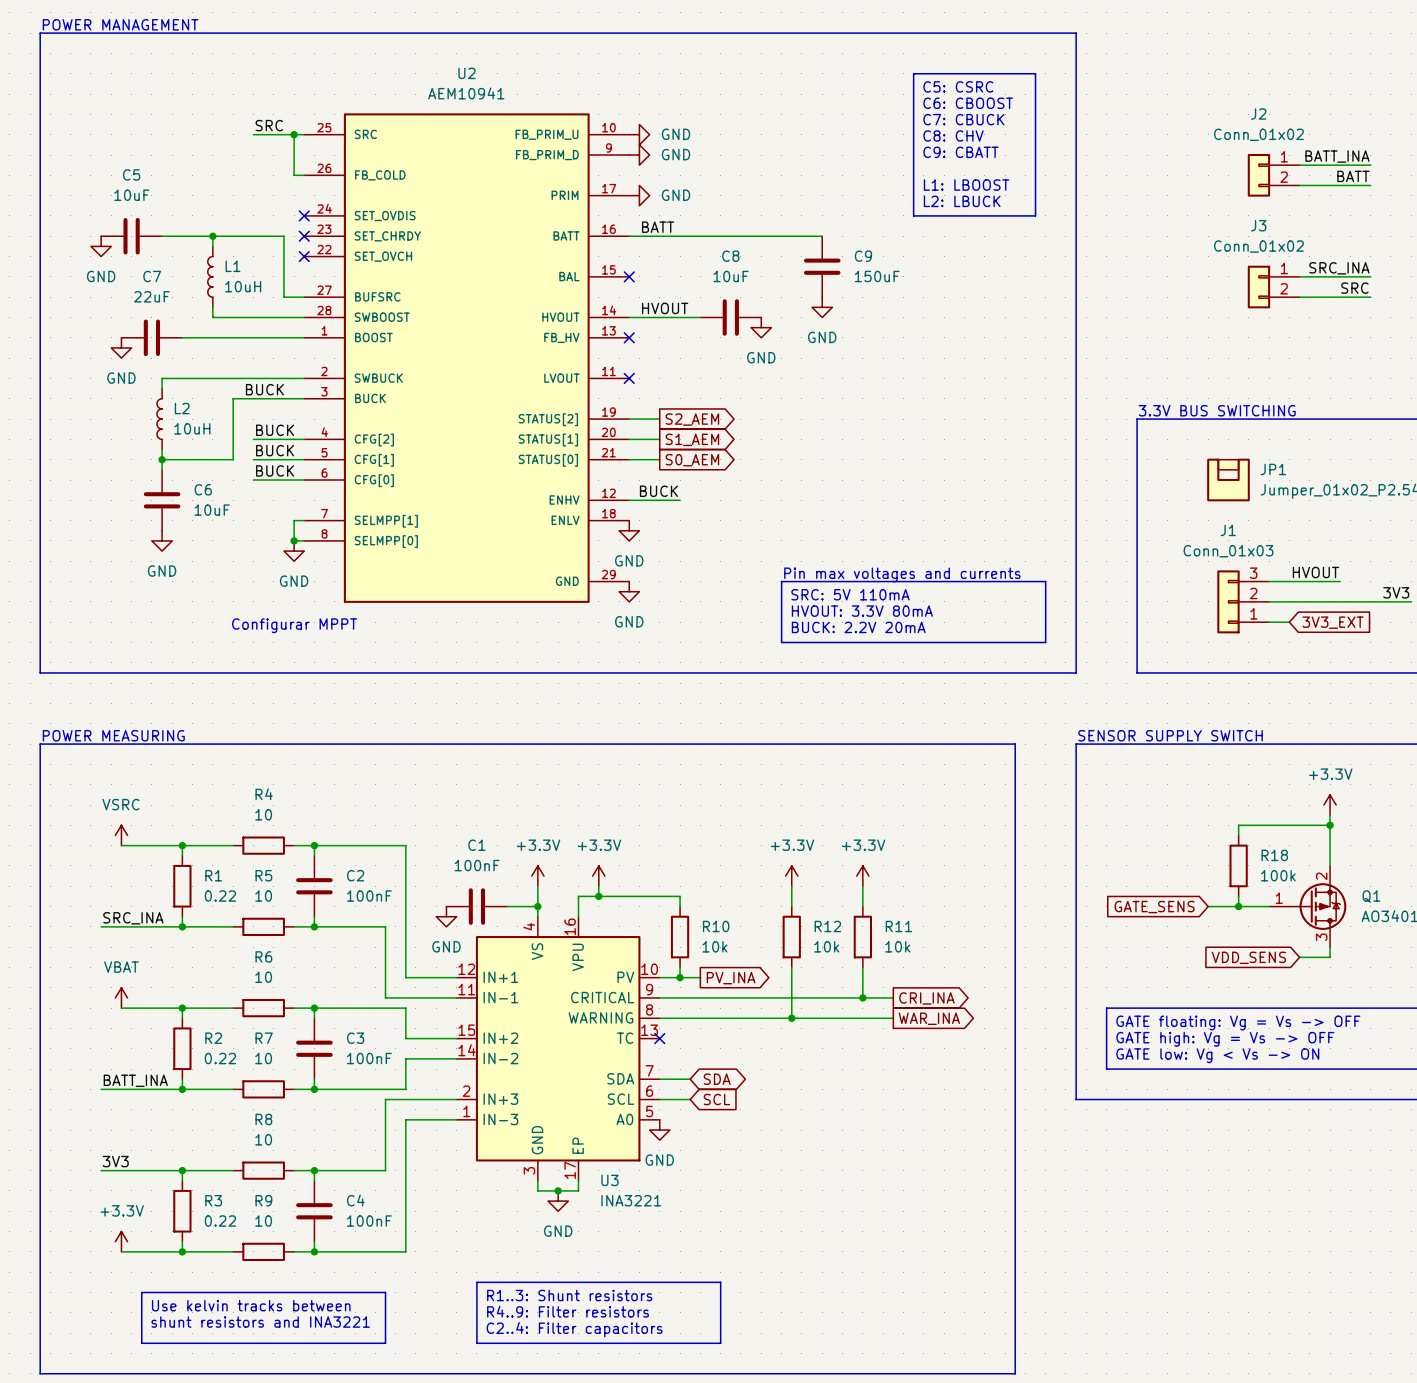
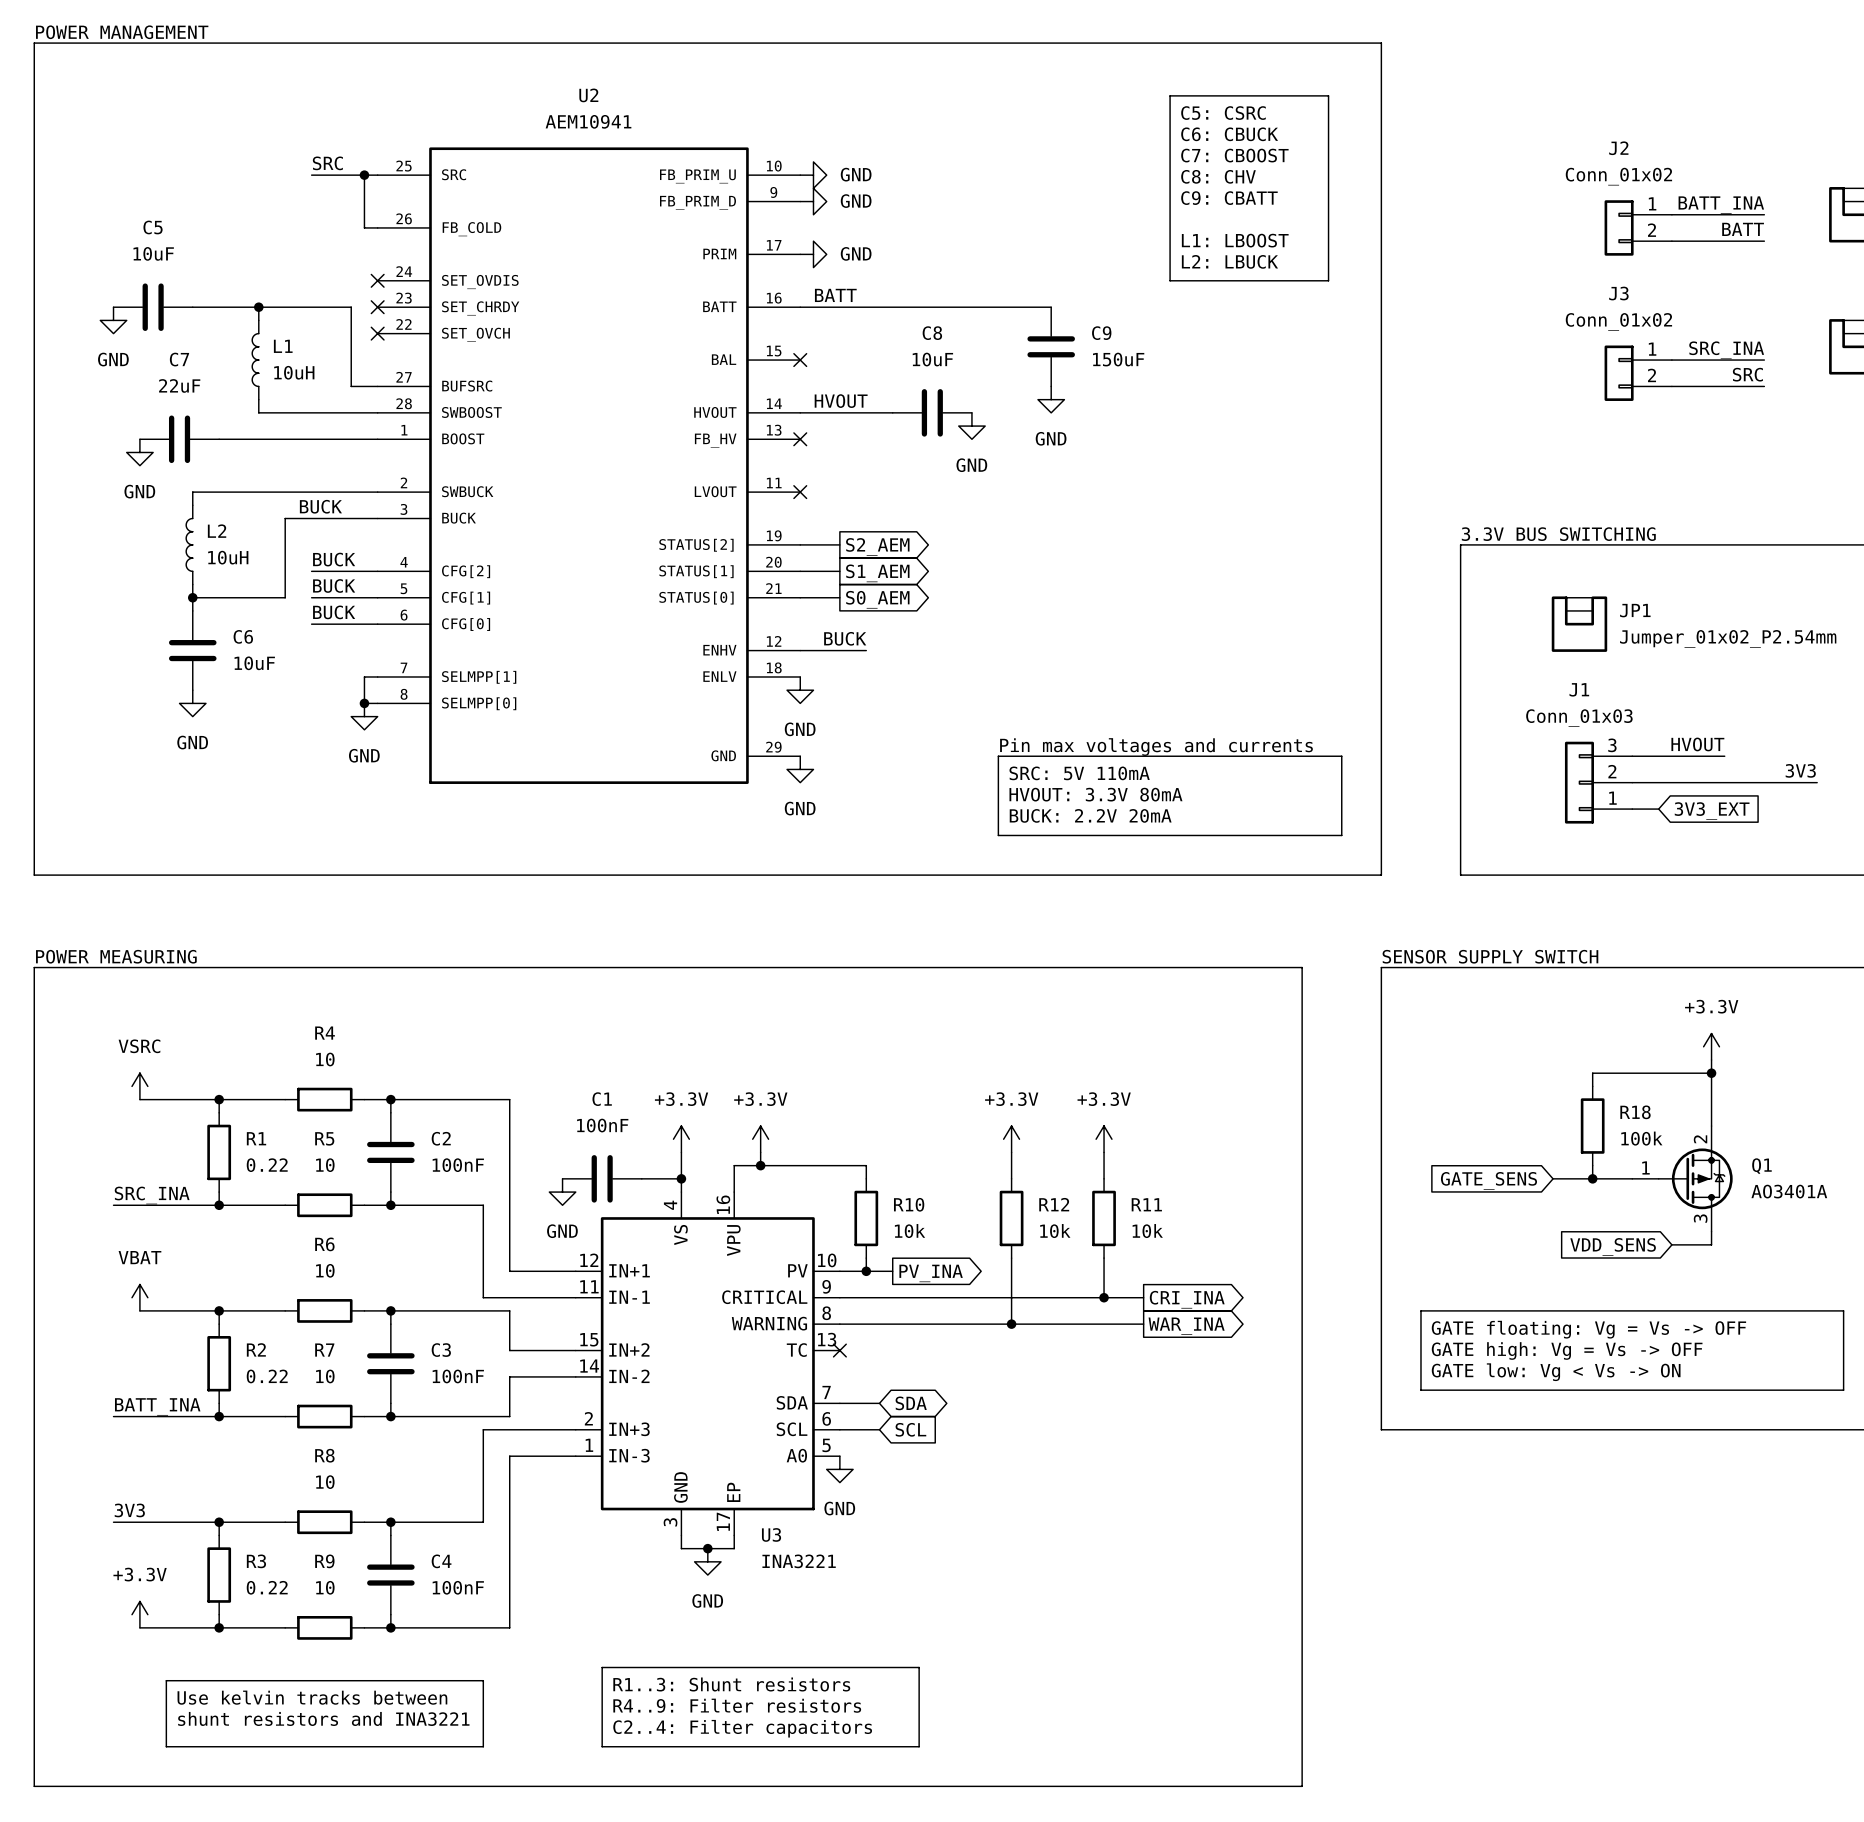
text: C6: CBOOST (968, 103) -> C6: CBUCK (1229, 134)
text: C7: CBUCK (963, 119) -> C7: CBOOST (1234, 155)
text: Configurar MPPT (294, 625) -> none

